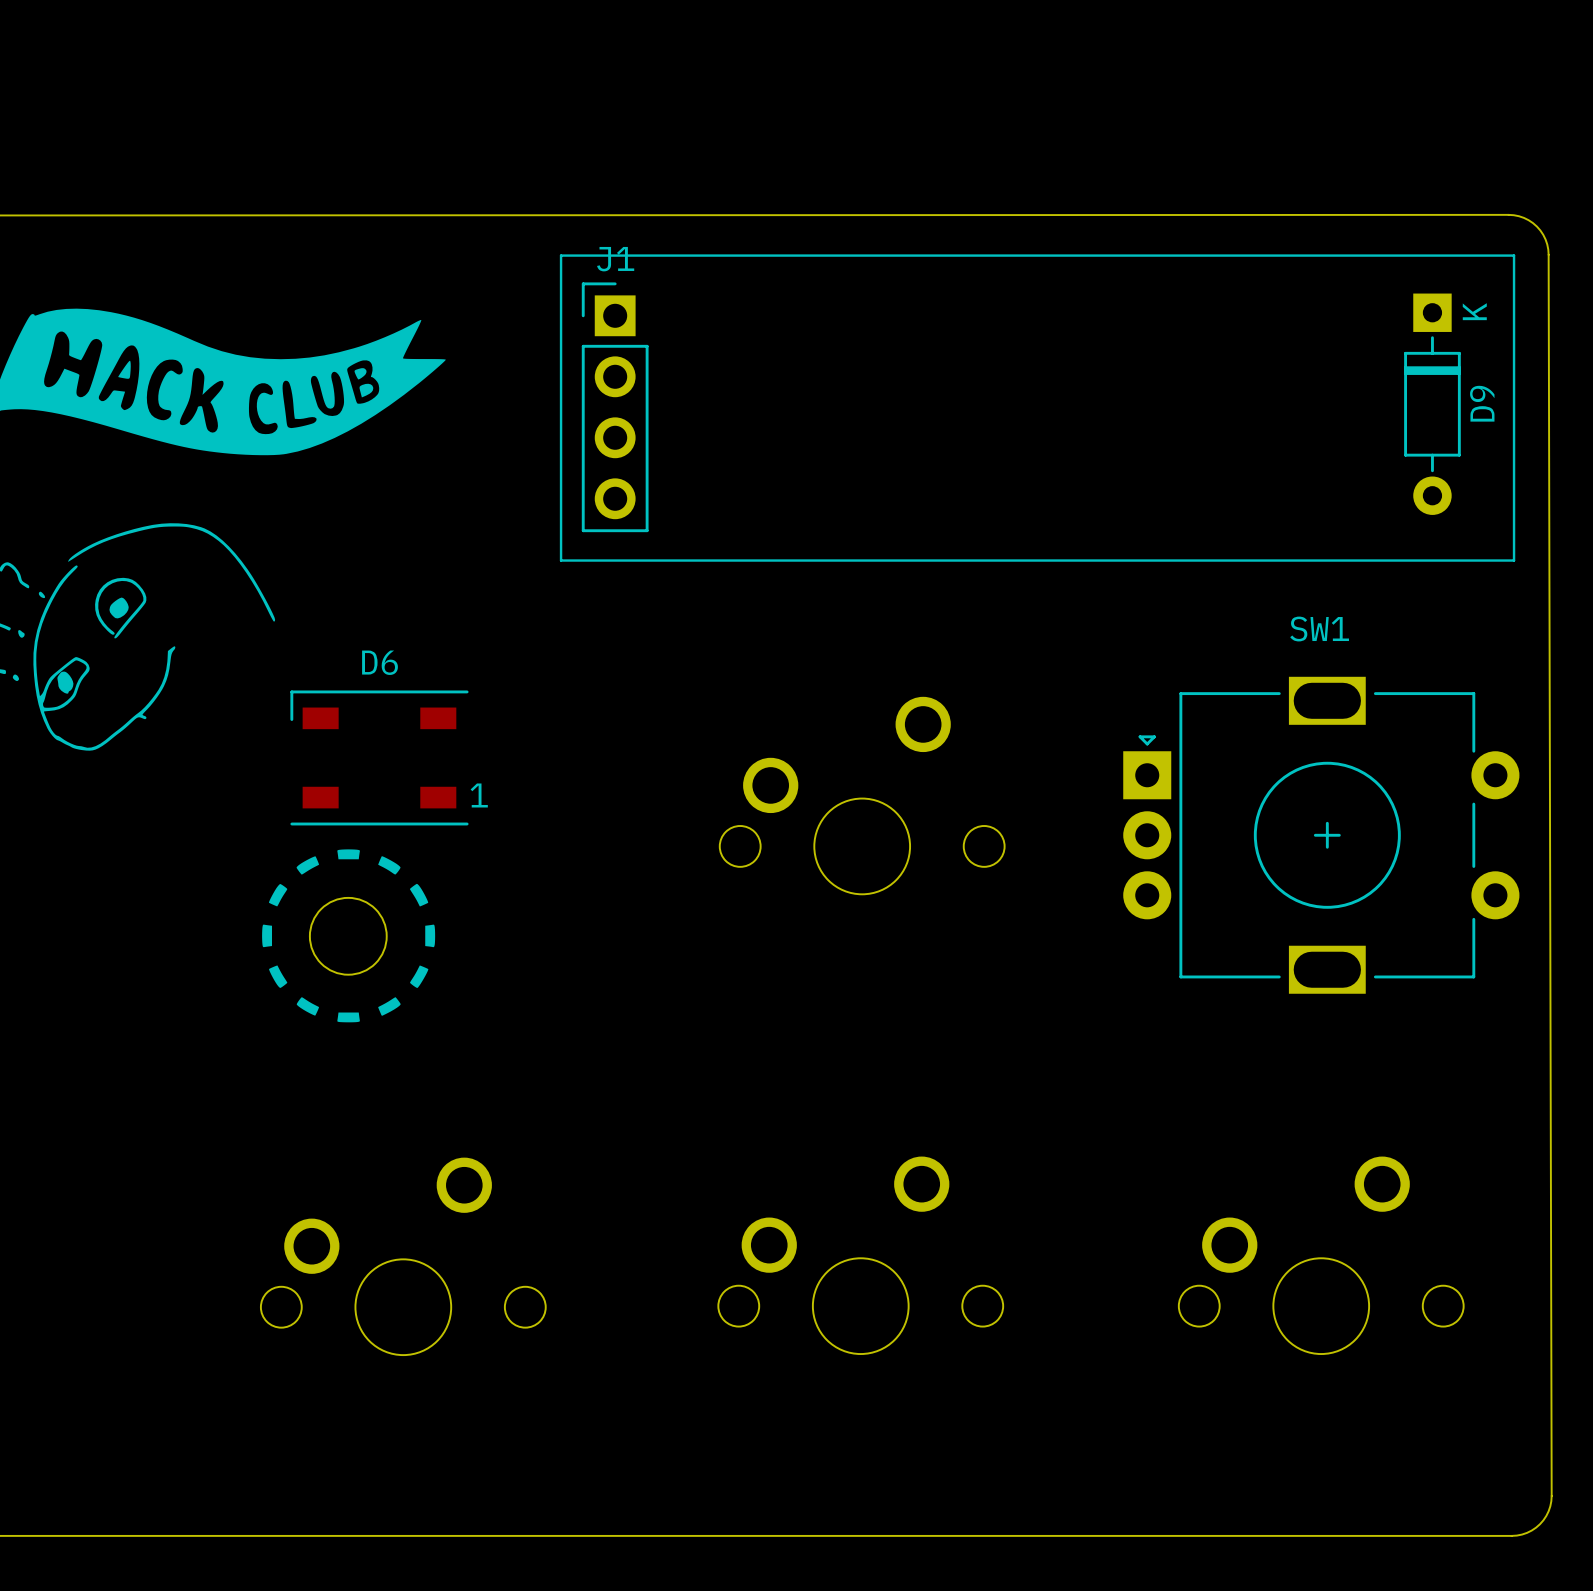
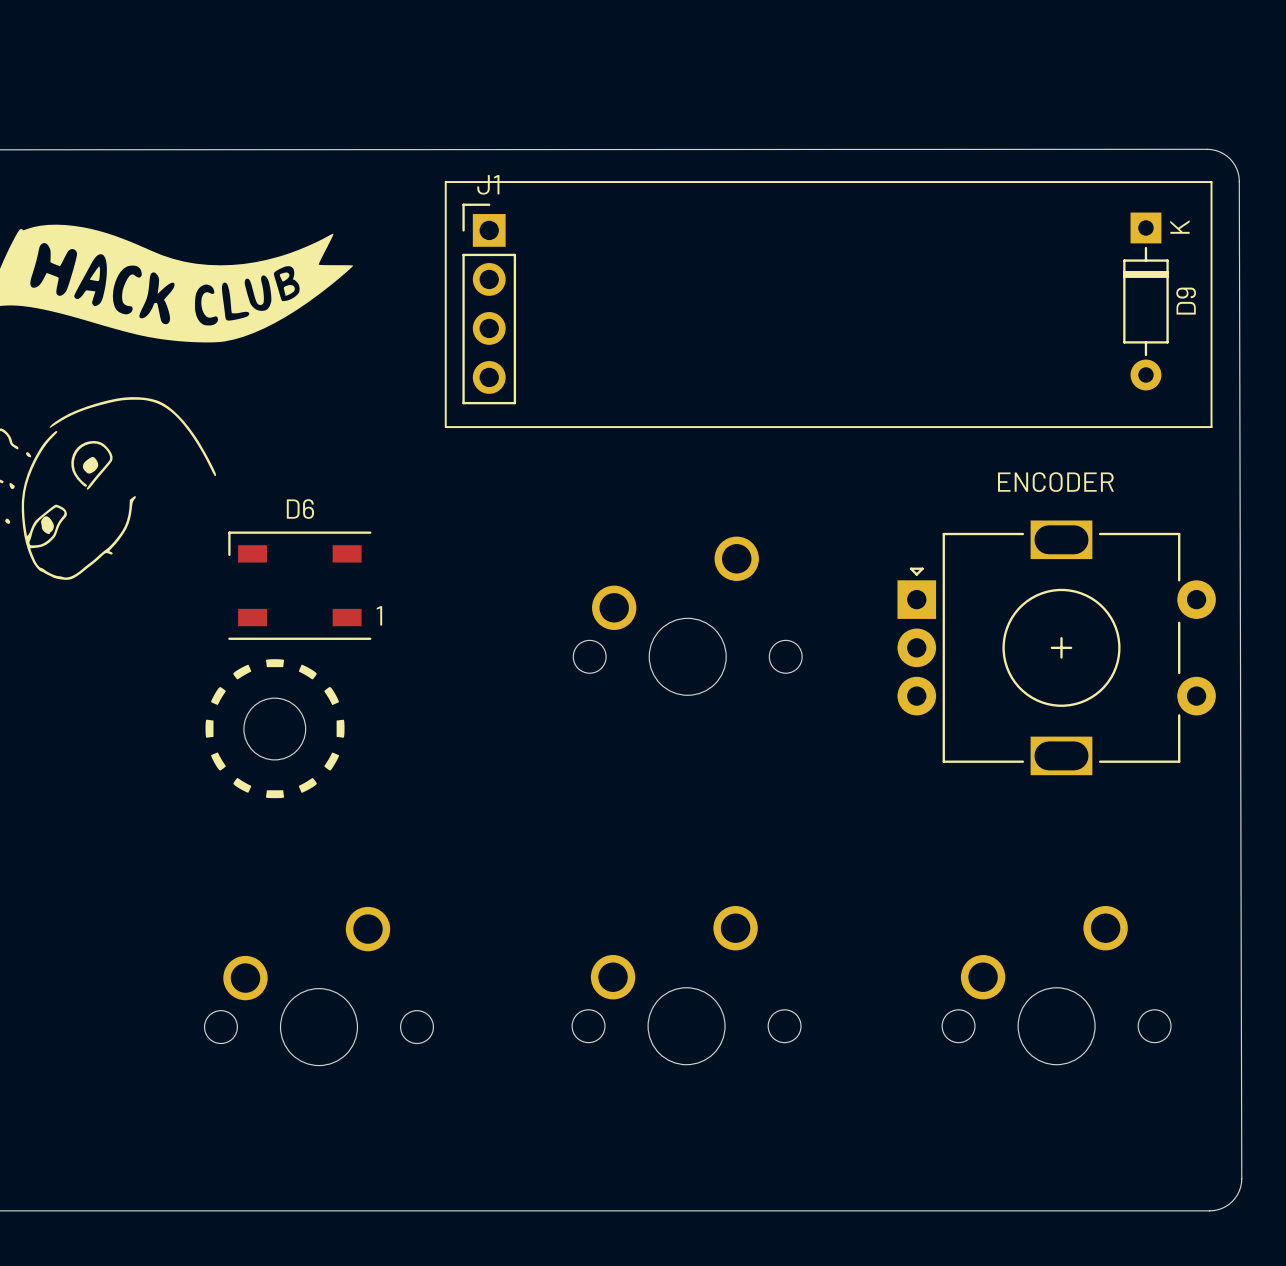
SW1 name: SW1 (1319, 629) -> ENCODER (1055, 482)

